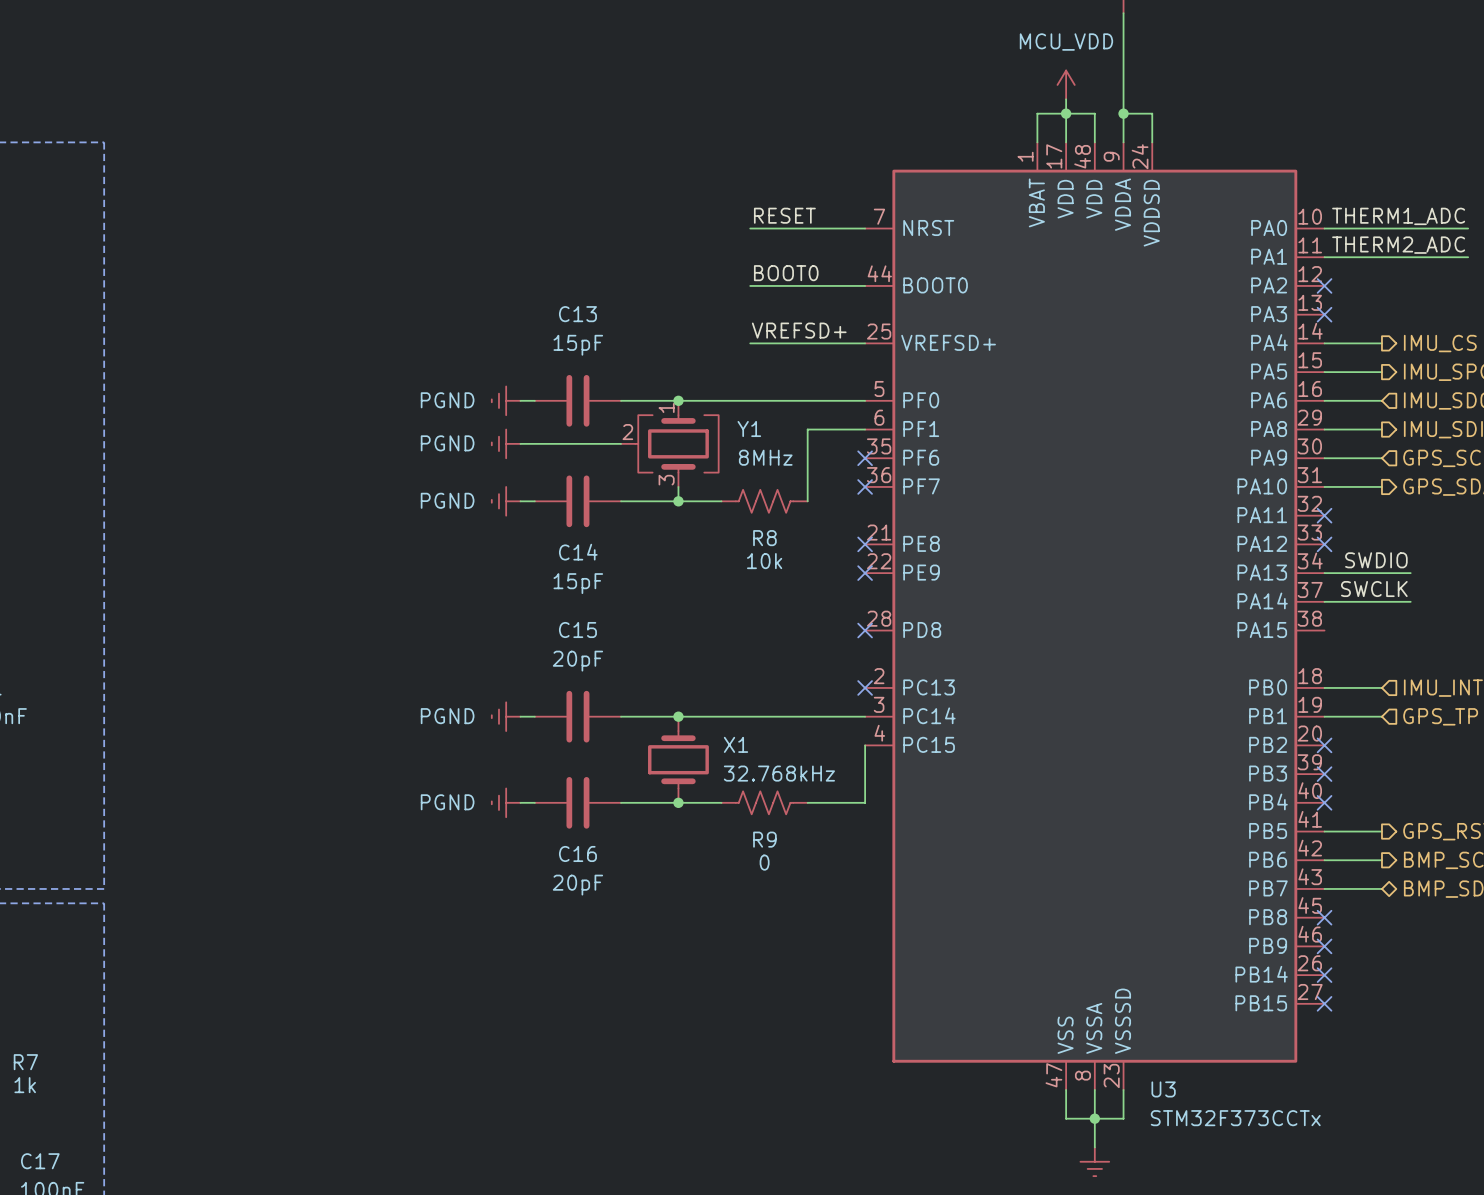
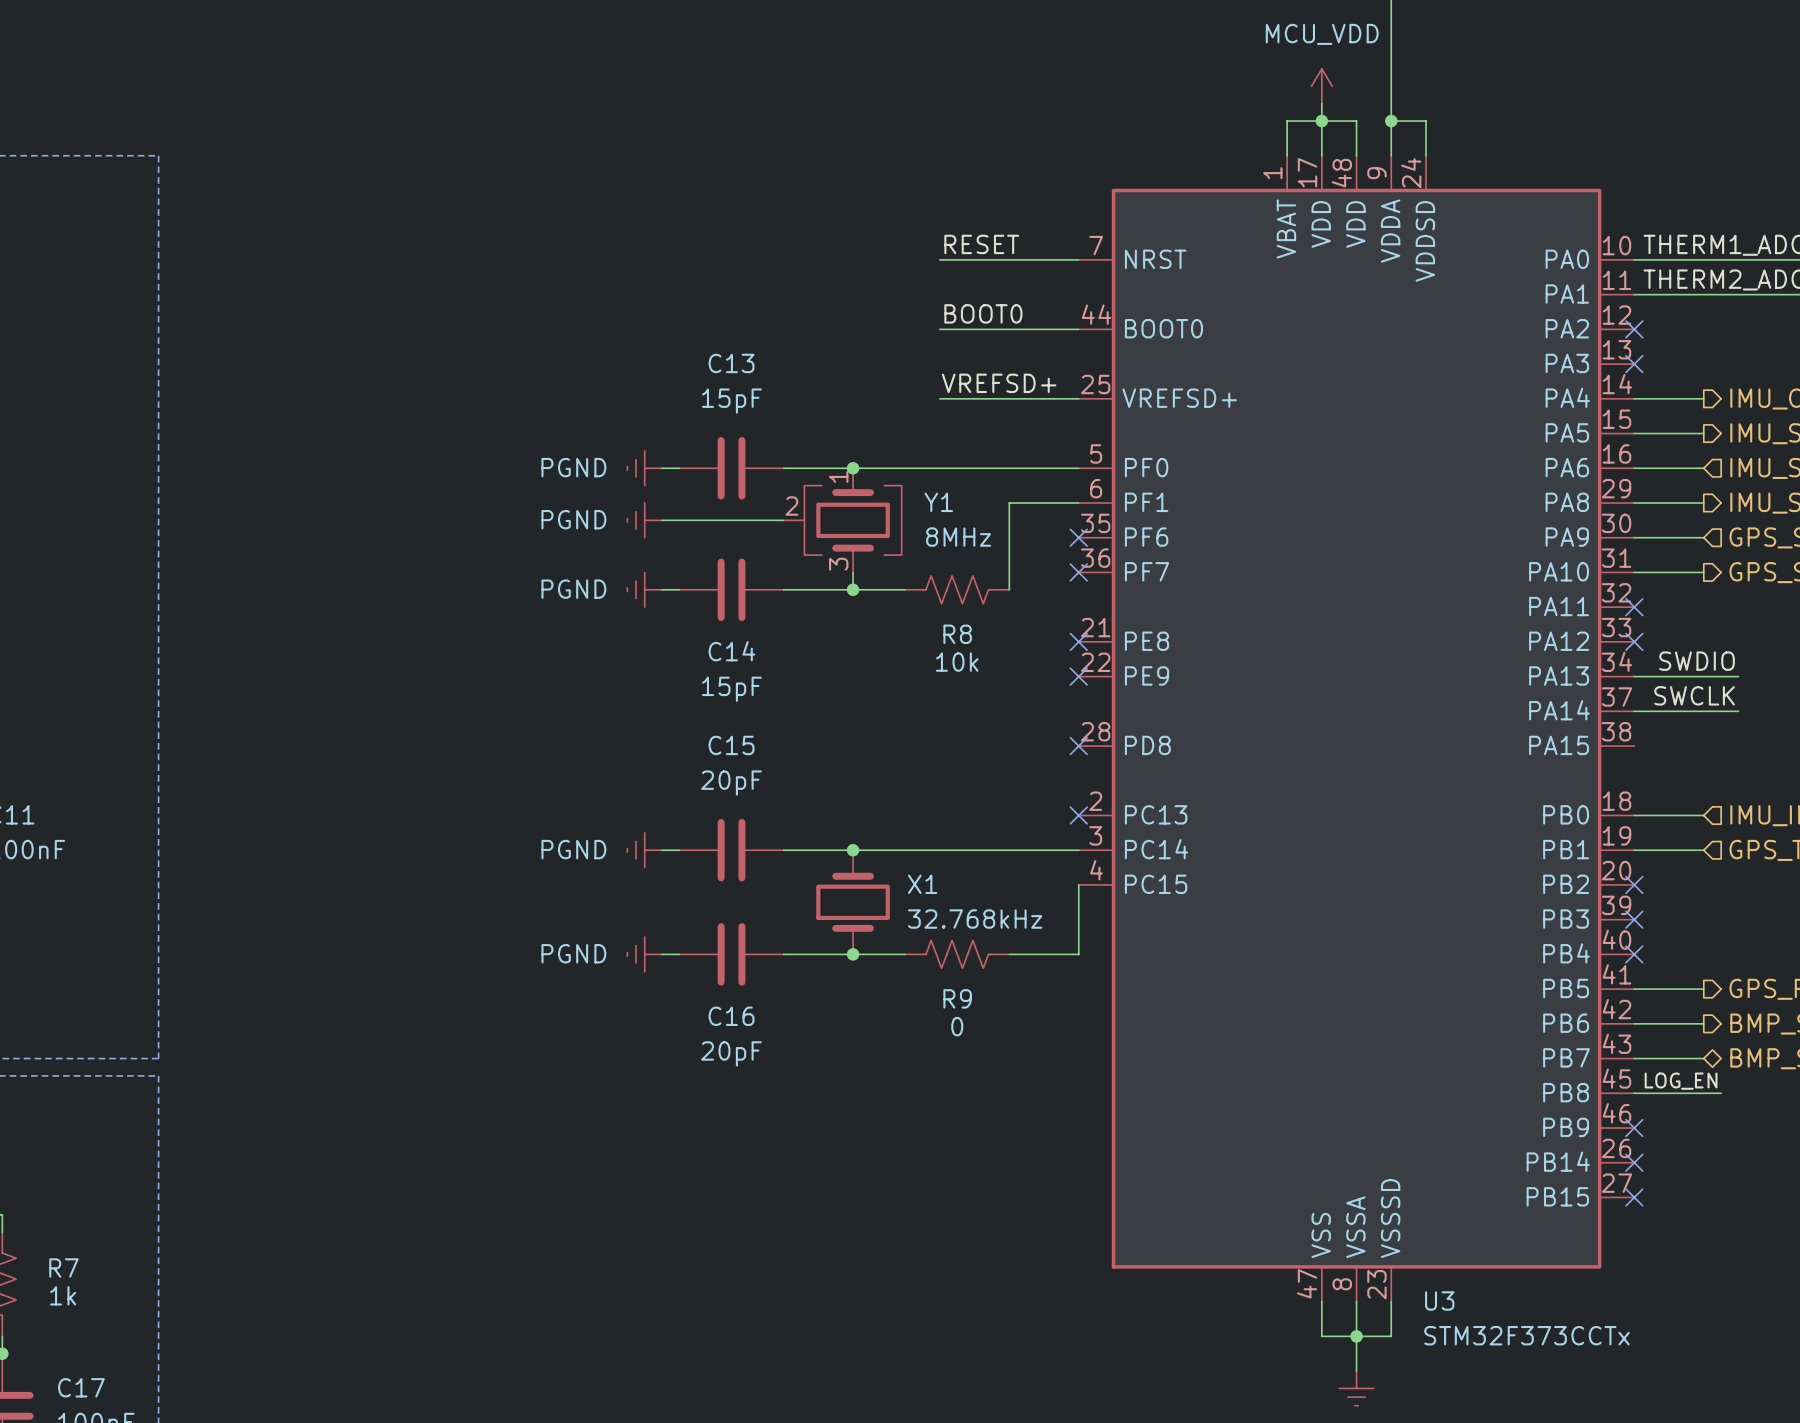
label: none -> LOG_EN (1681, 1081)
wire: none -> (1634, 1093) (1721, 1093)
no-connect mark: (1324, 917) -> none

